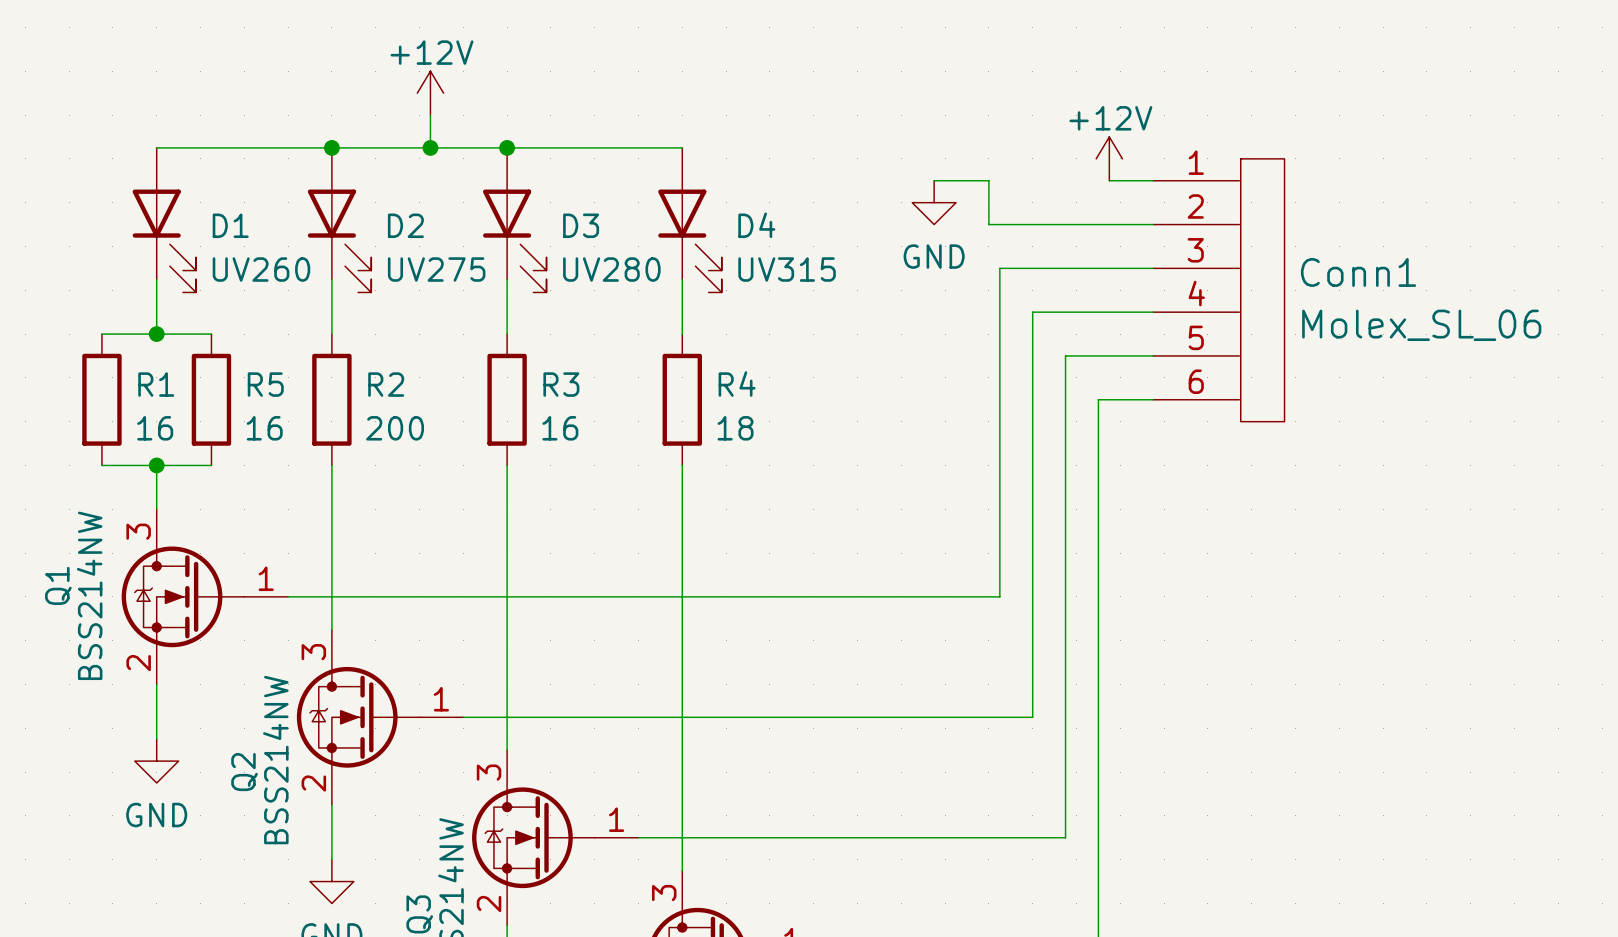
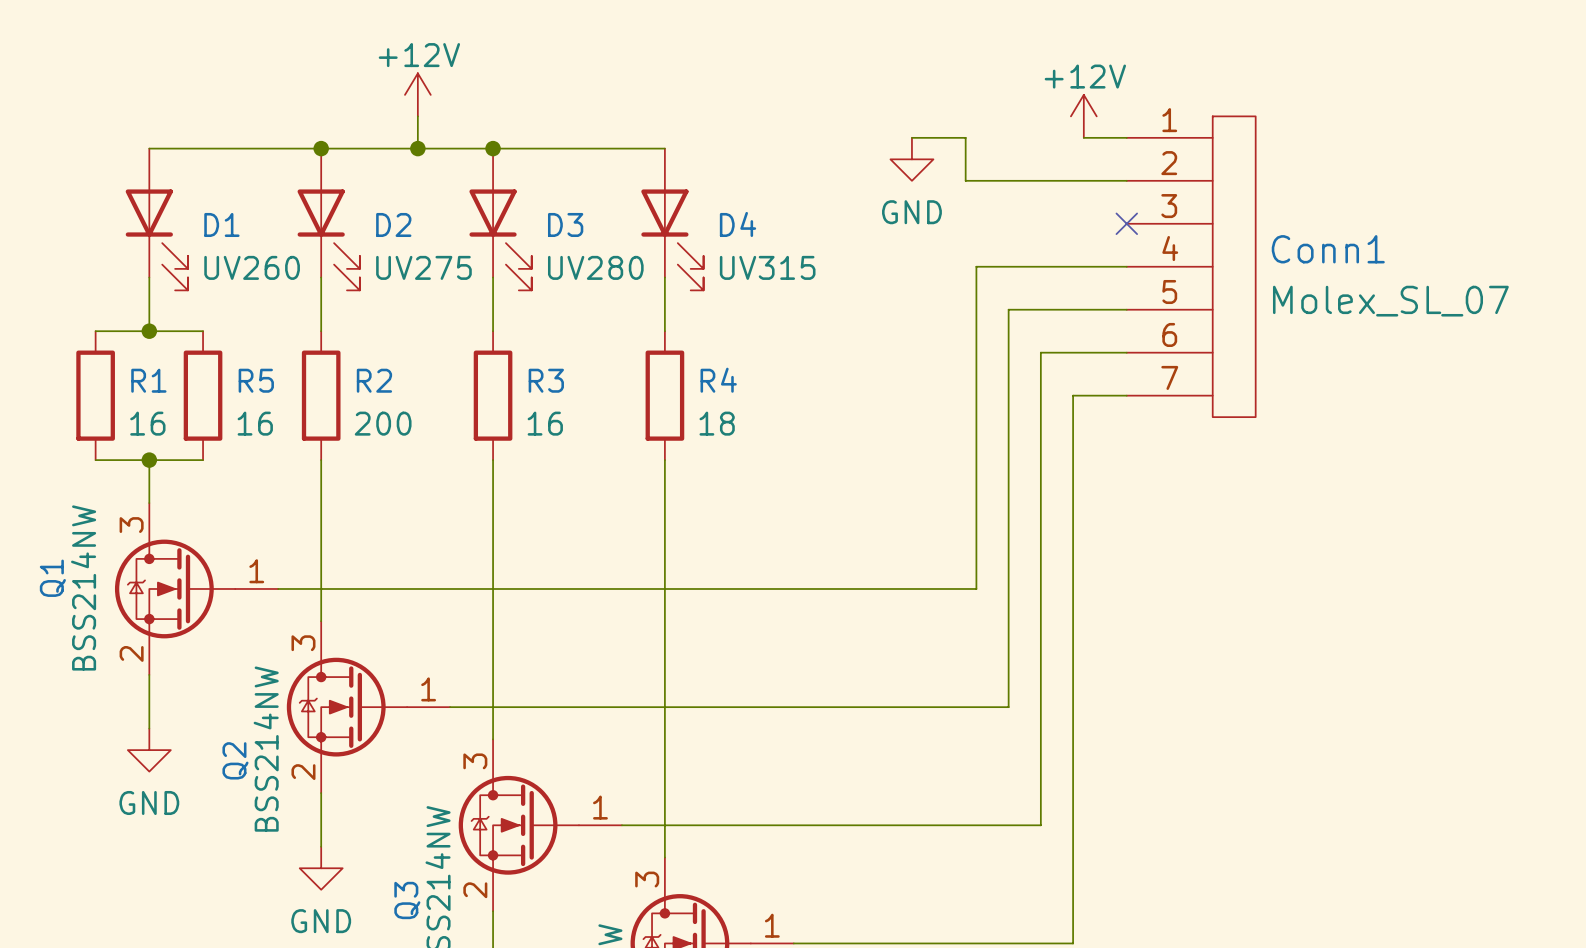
wire: none -> (911, 137) (965, 137) (965, 180) (1083, 180)
wire: none -> (1083, 137) (1126, 137)
power symbol position: +12V (1109, 158) -> +12V (1083, 116)
Conn1 symbol: [1153, 158, 1285, 422] -> [1126, 116, 1256, 418]
wire: (934, 180) (988, 180) (988, 224) (1153, 224) -> none
power symbol position: GND (934, 202) -> GND (911, 159)
no-connect mark: none -> (1126, 223)
Conn1 value: Molex_SL_06 (1421, 325) -> Molex_SL_07 (1390, 301)

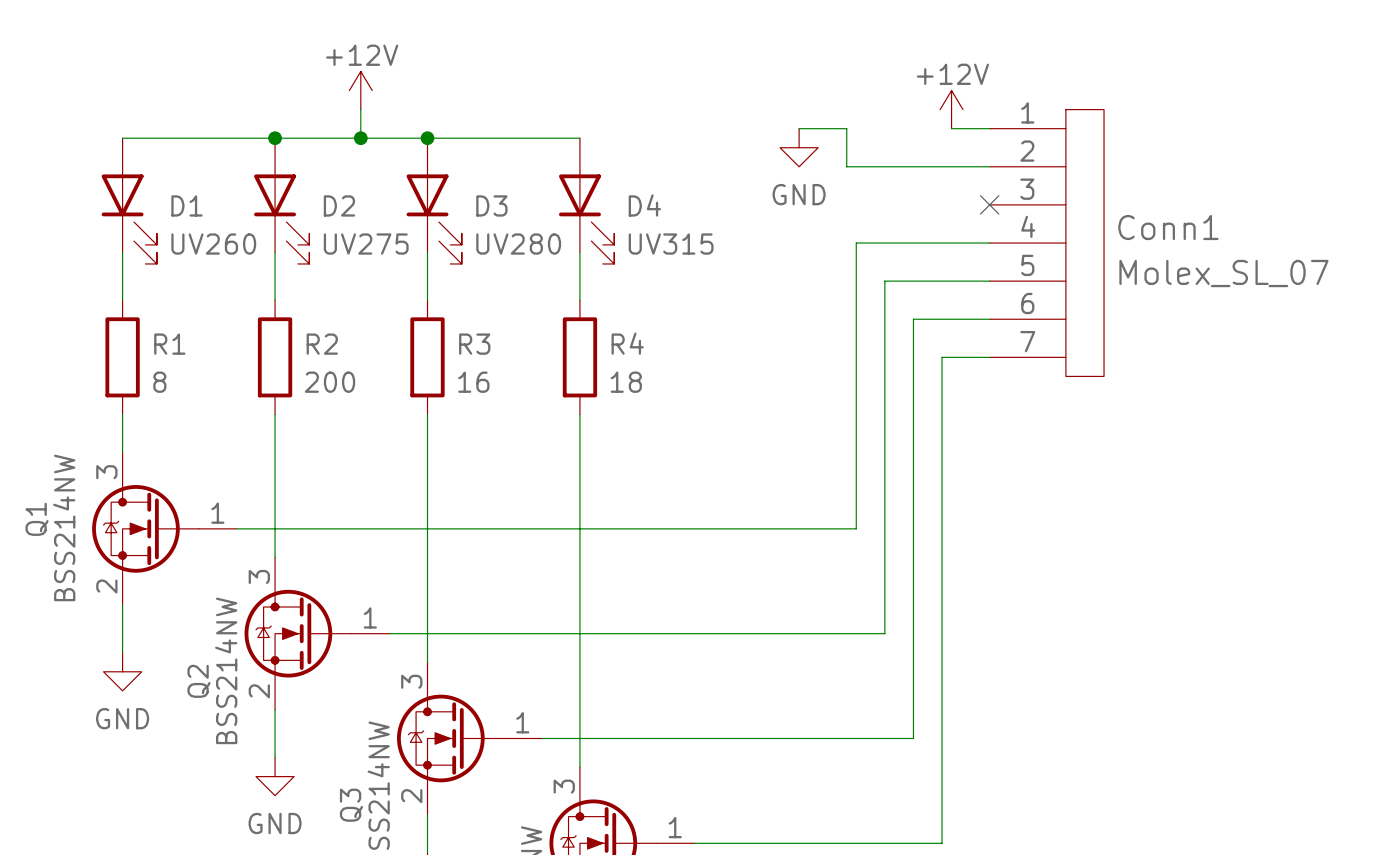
wire: (95, 331) (203, 331) -> none
junction: (149, 331) -> none
R1 position: (95, 395) -> (122, 357)
R5: 16 (203, 395) -> none
R1 value: 16 (147, 423) -> 8 (159, 382)
wire: (95, 460) (203, 460) -> none
junction: (149, 460) -> none

